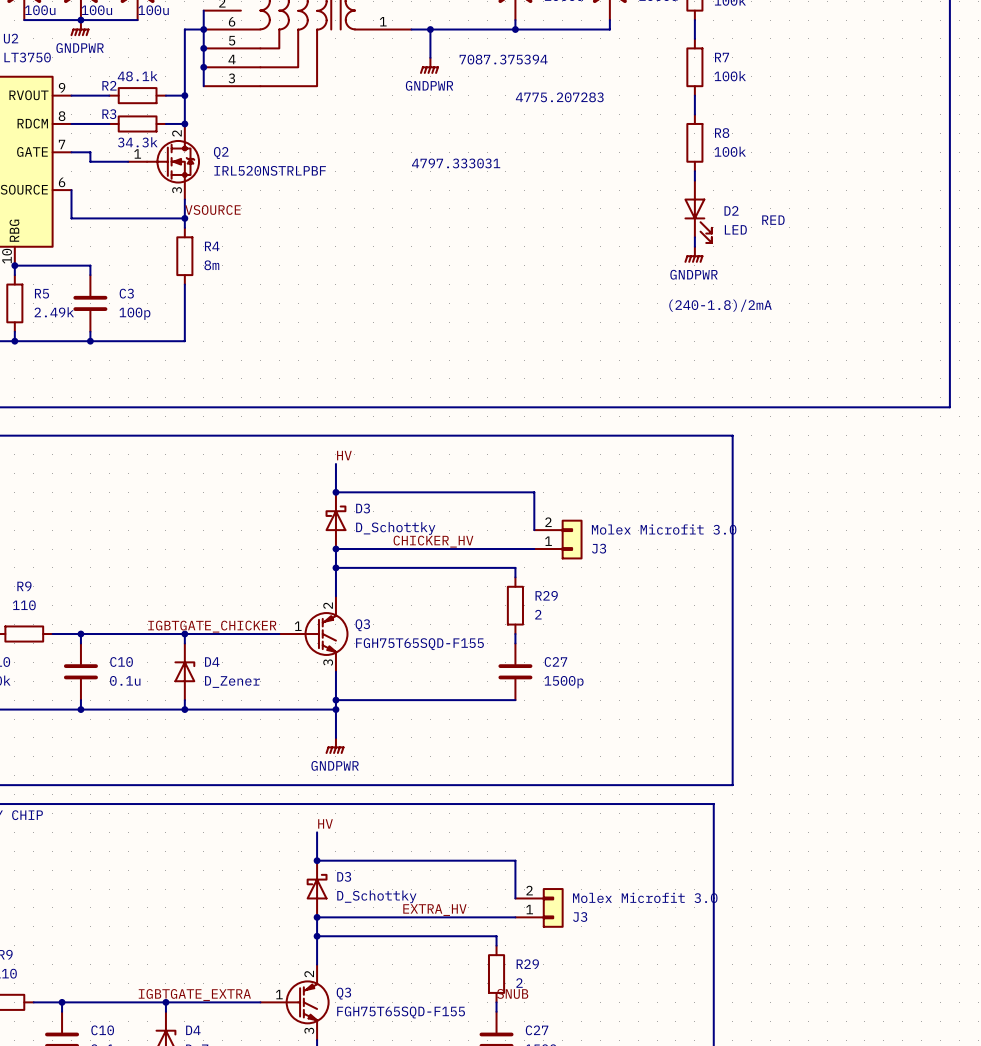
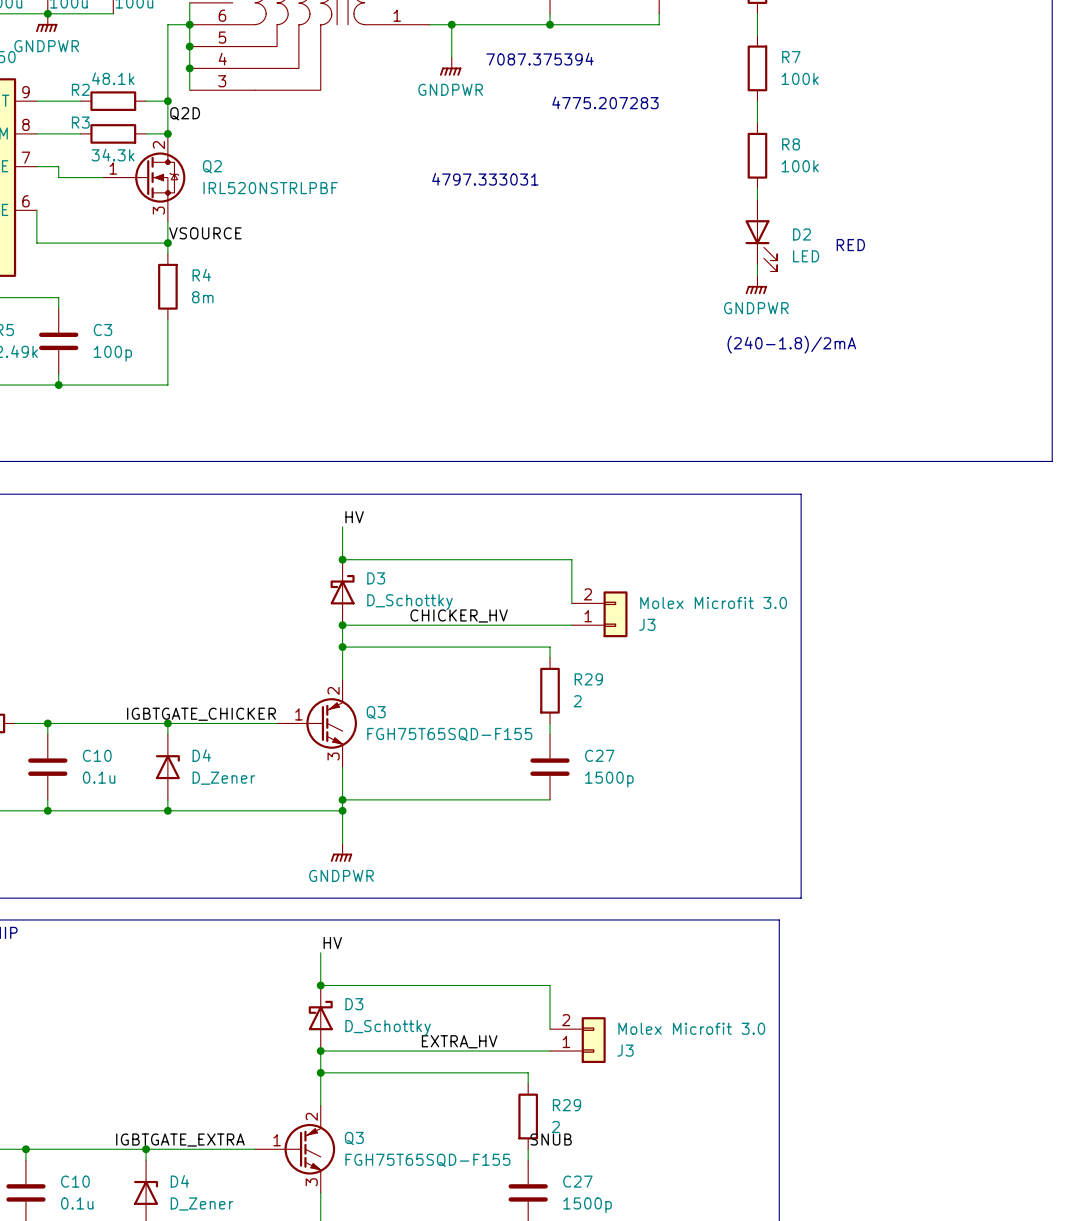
label: none -> Q2D (185, 113)

